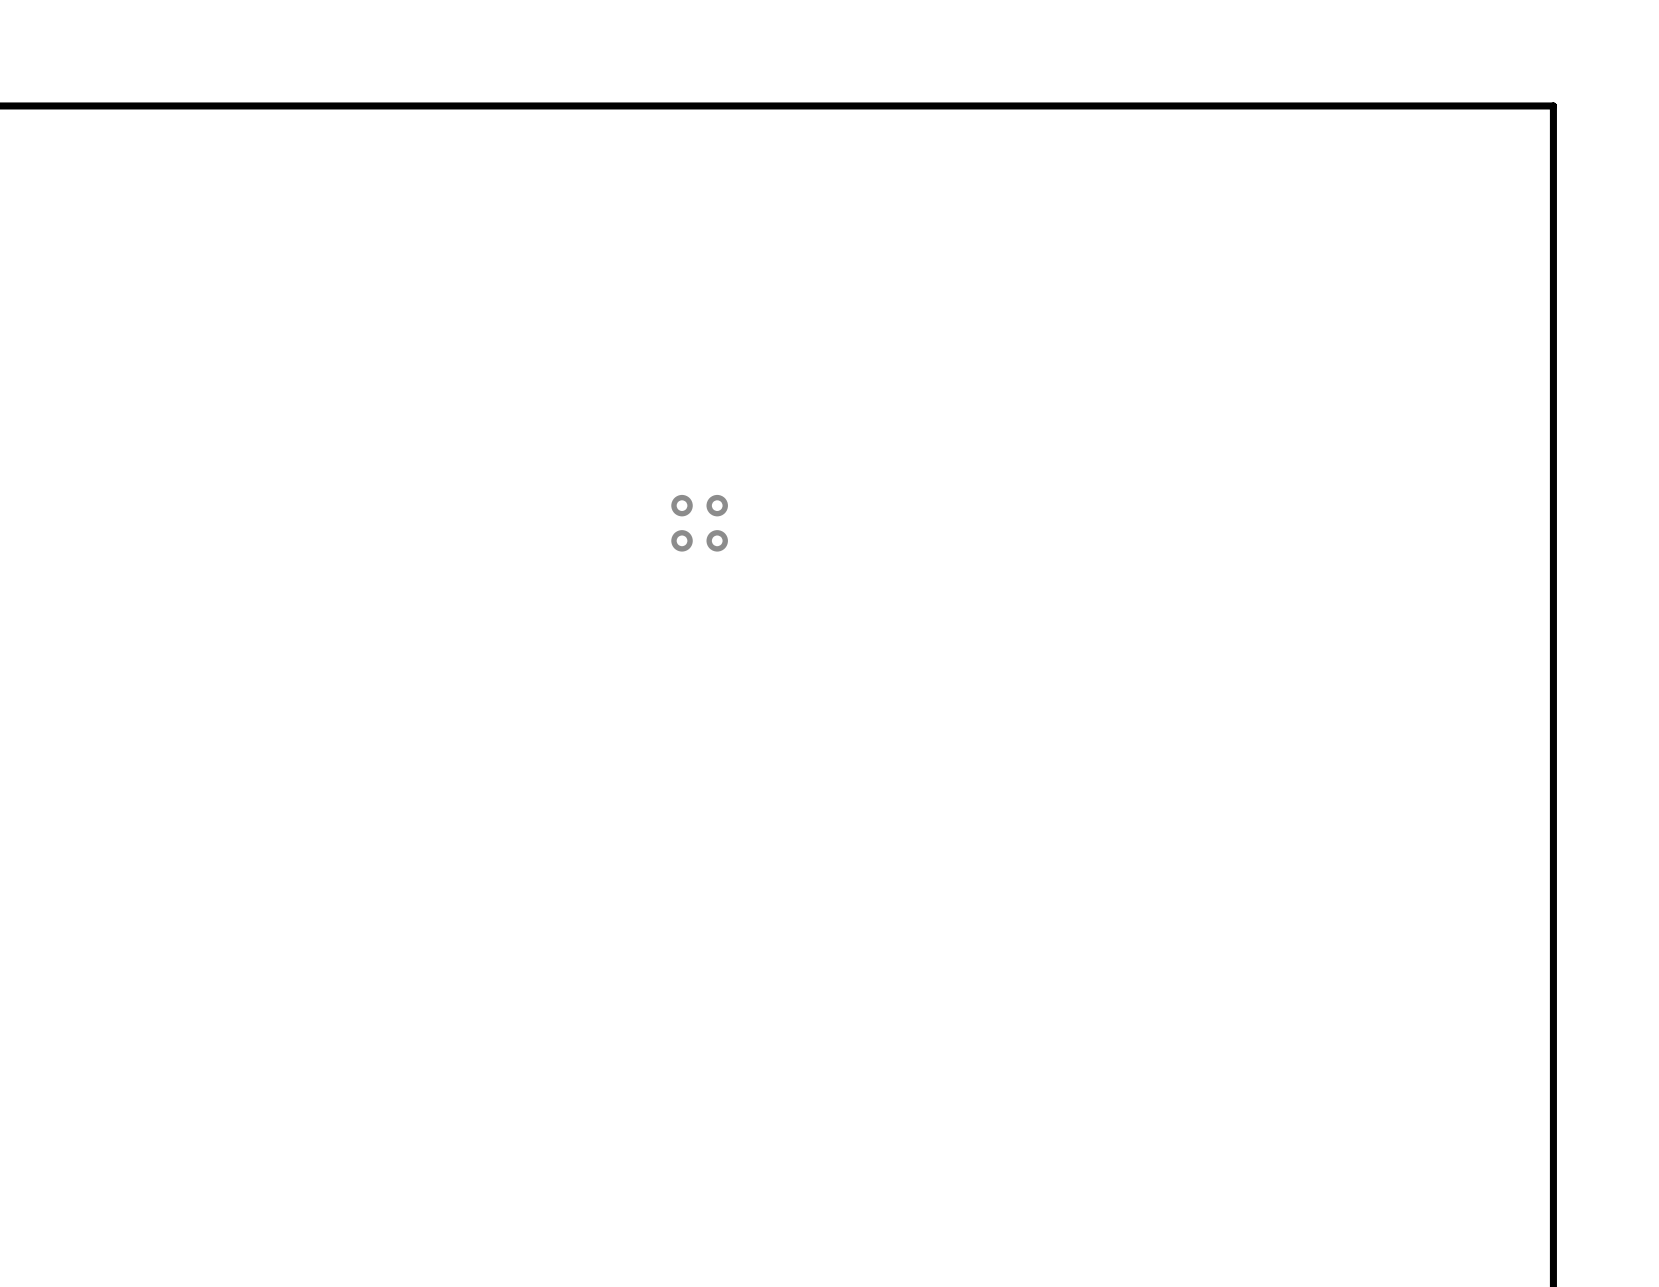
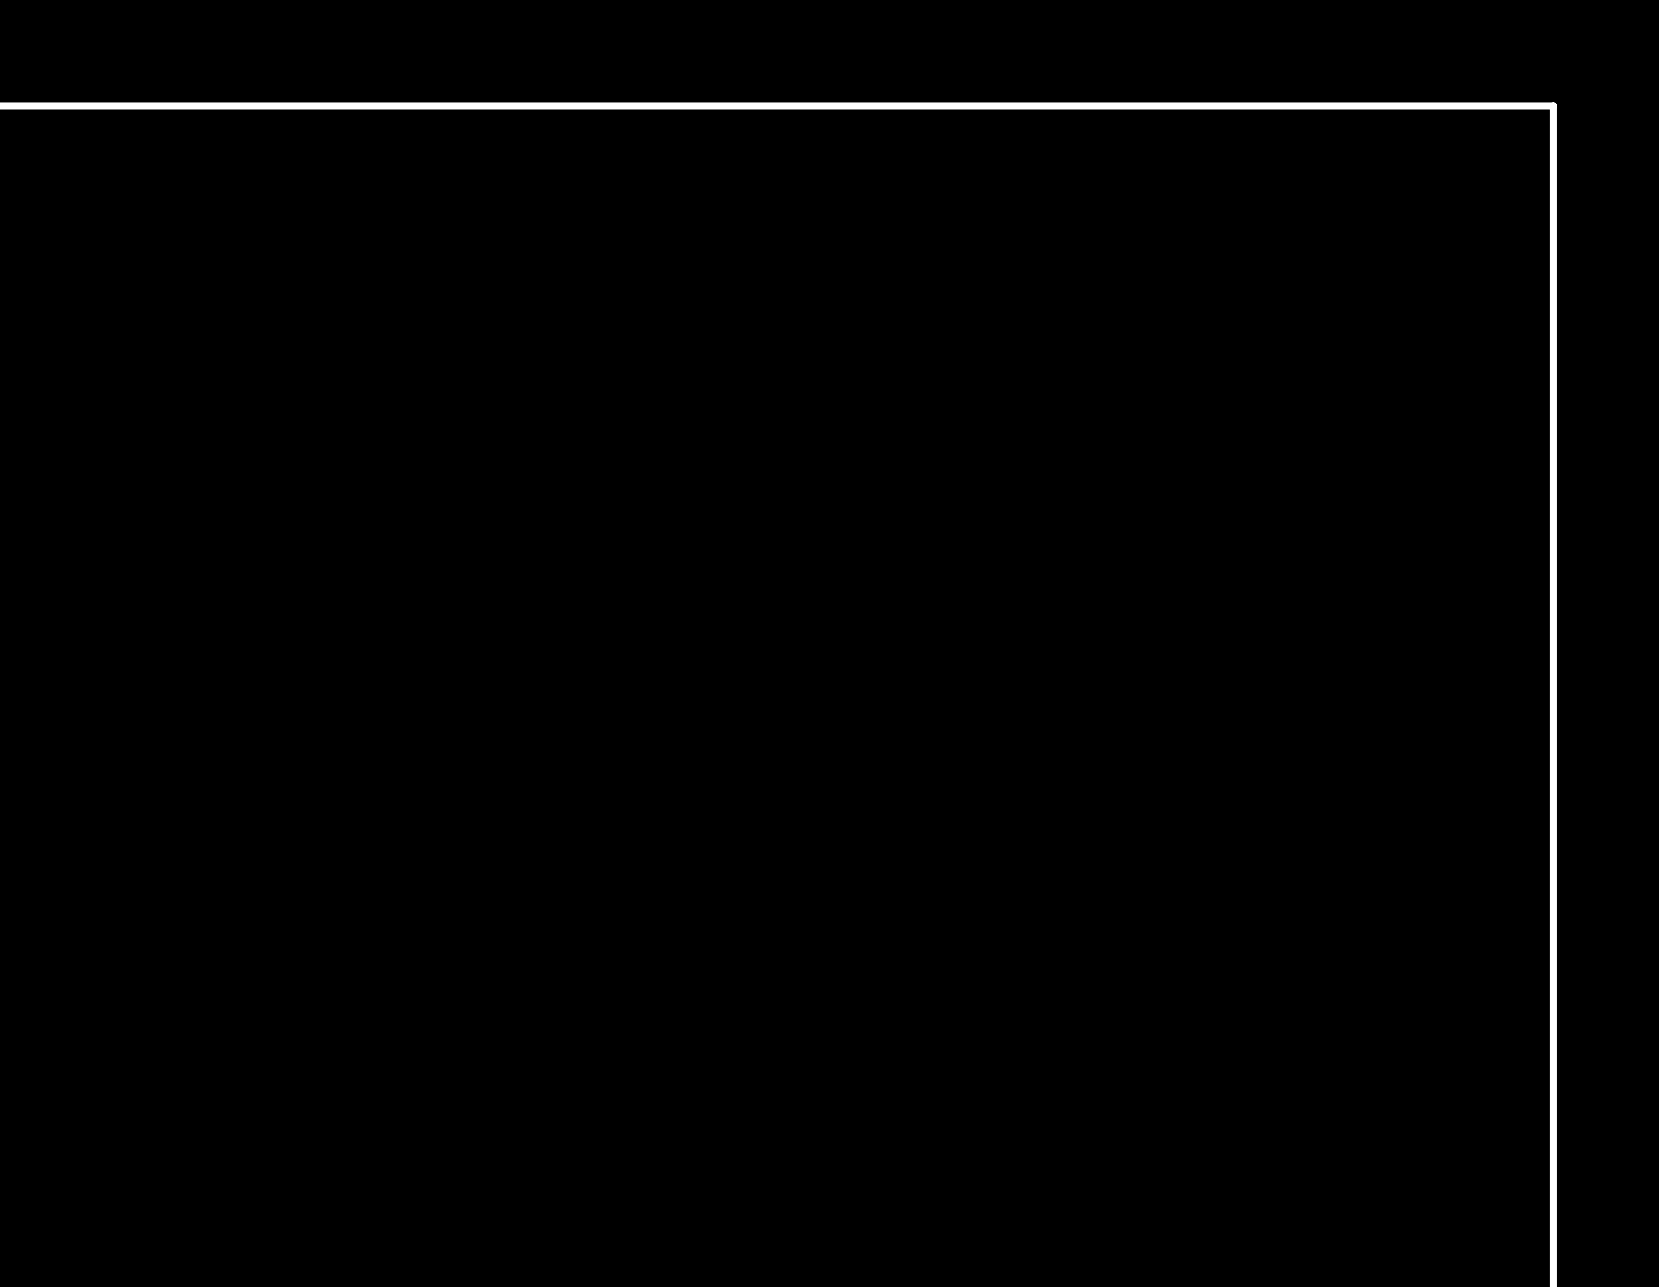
part: (699, 523) -> none

